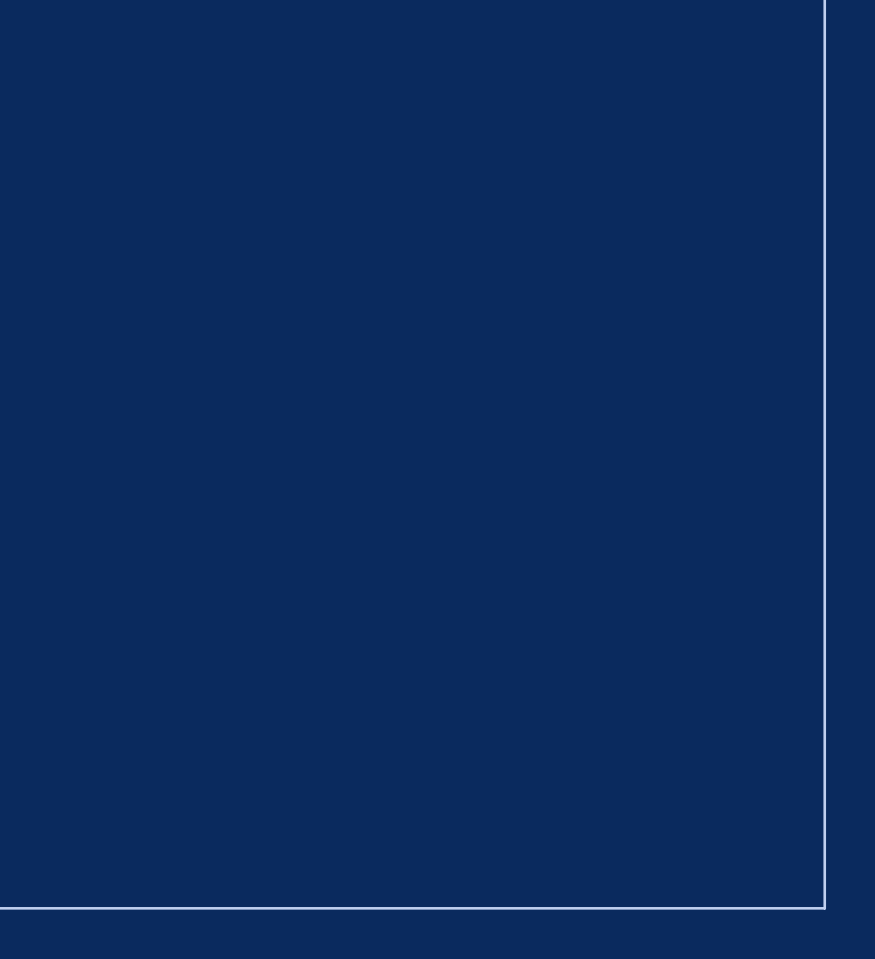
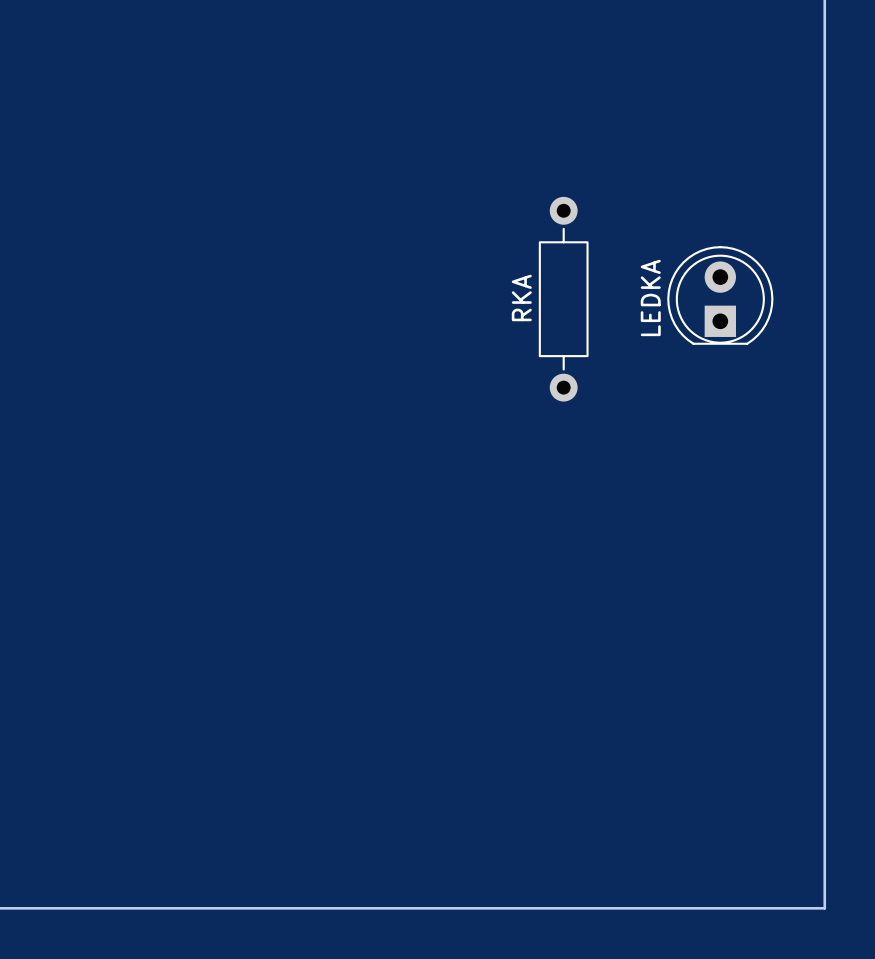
LEDKA: none -> (720, 295)
RKA: none -> (563, 299)

